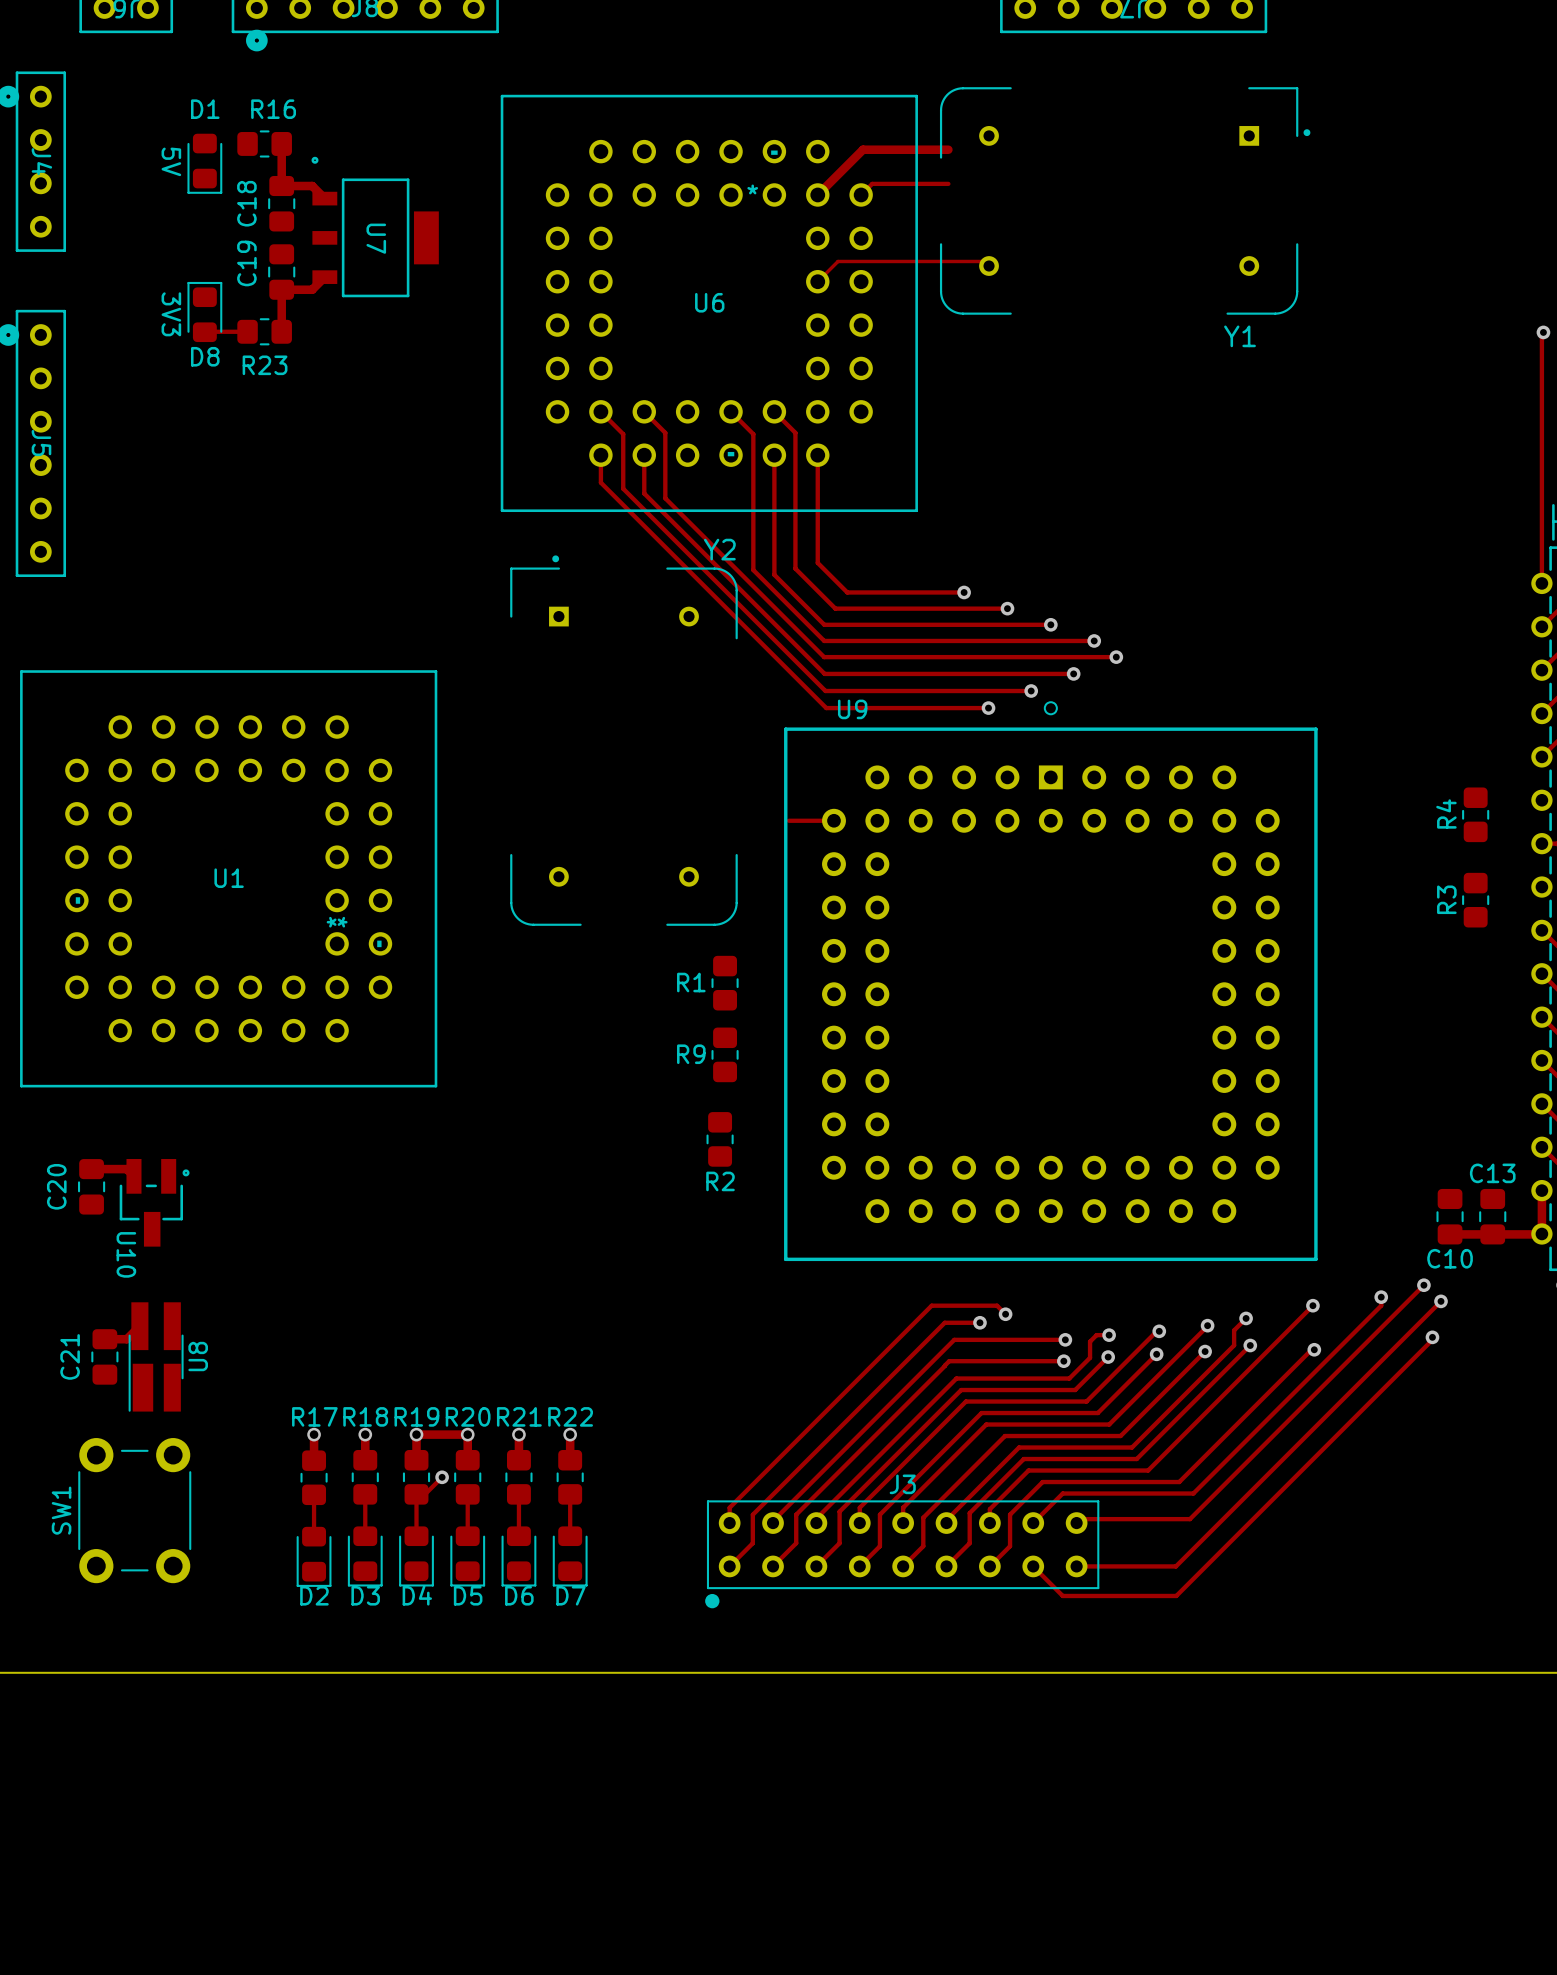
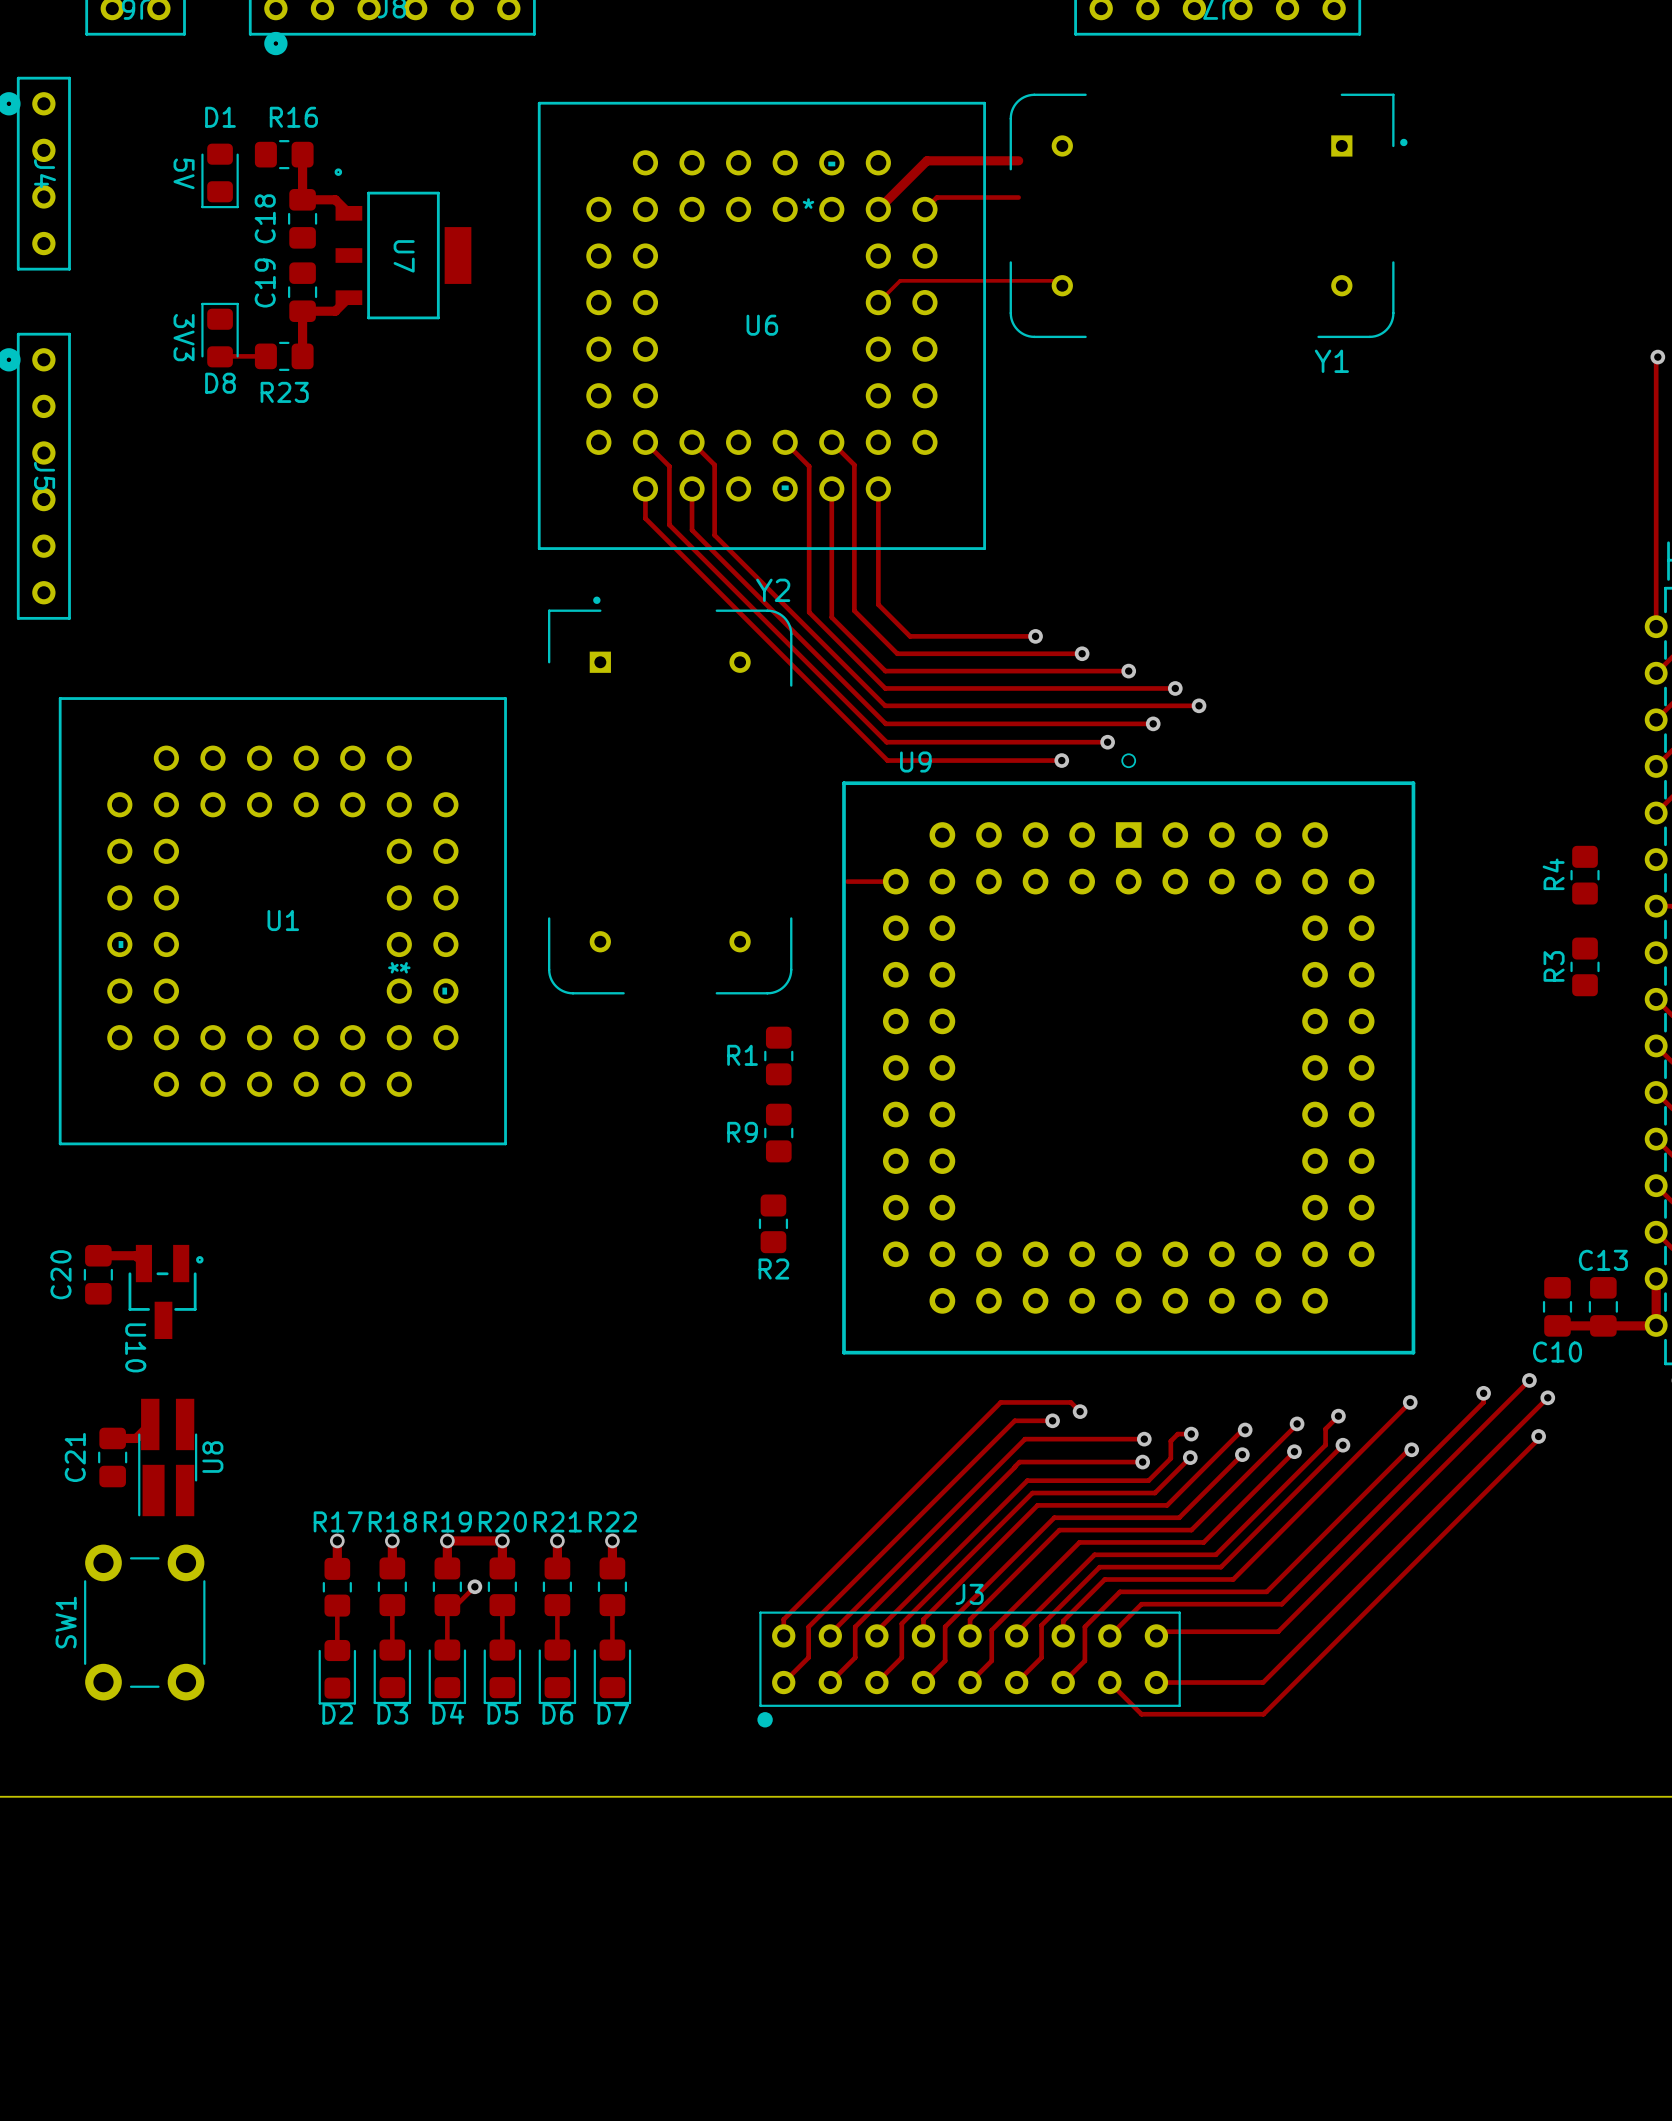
U1 position: (228, 878) -> (282, 921)

